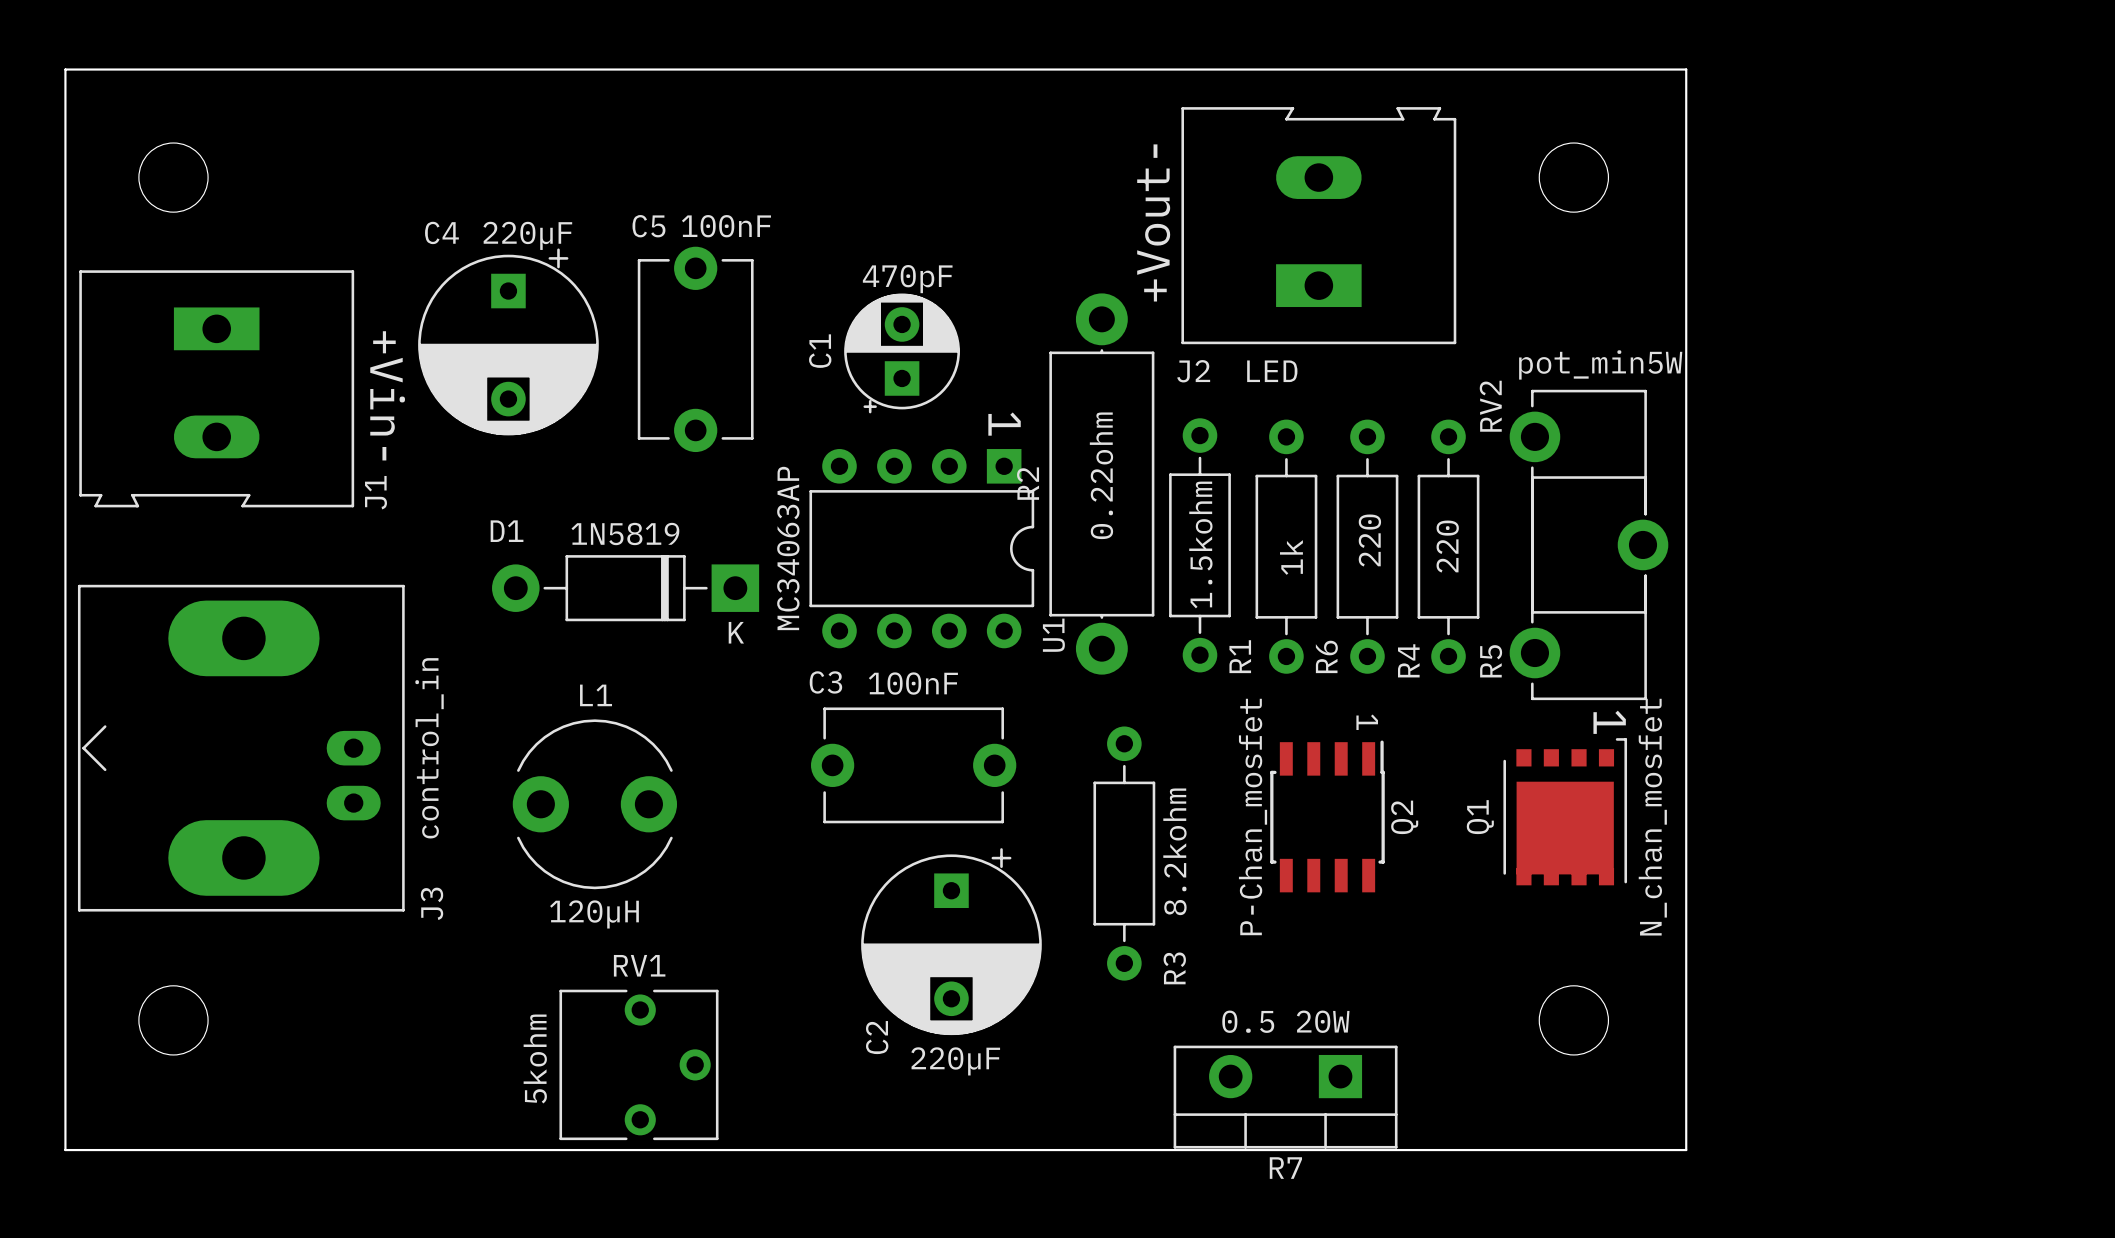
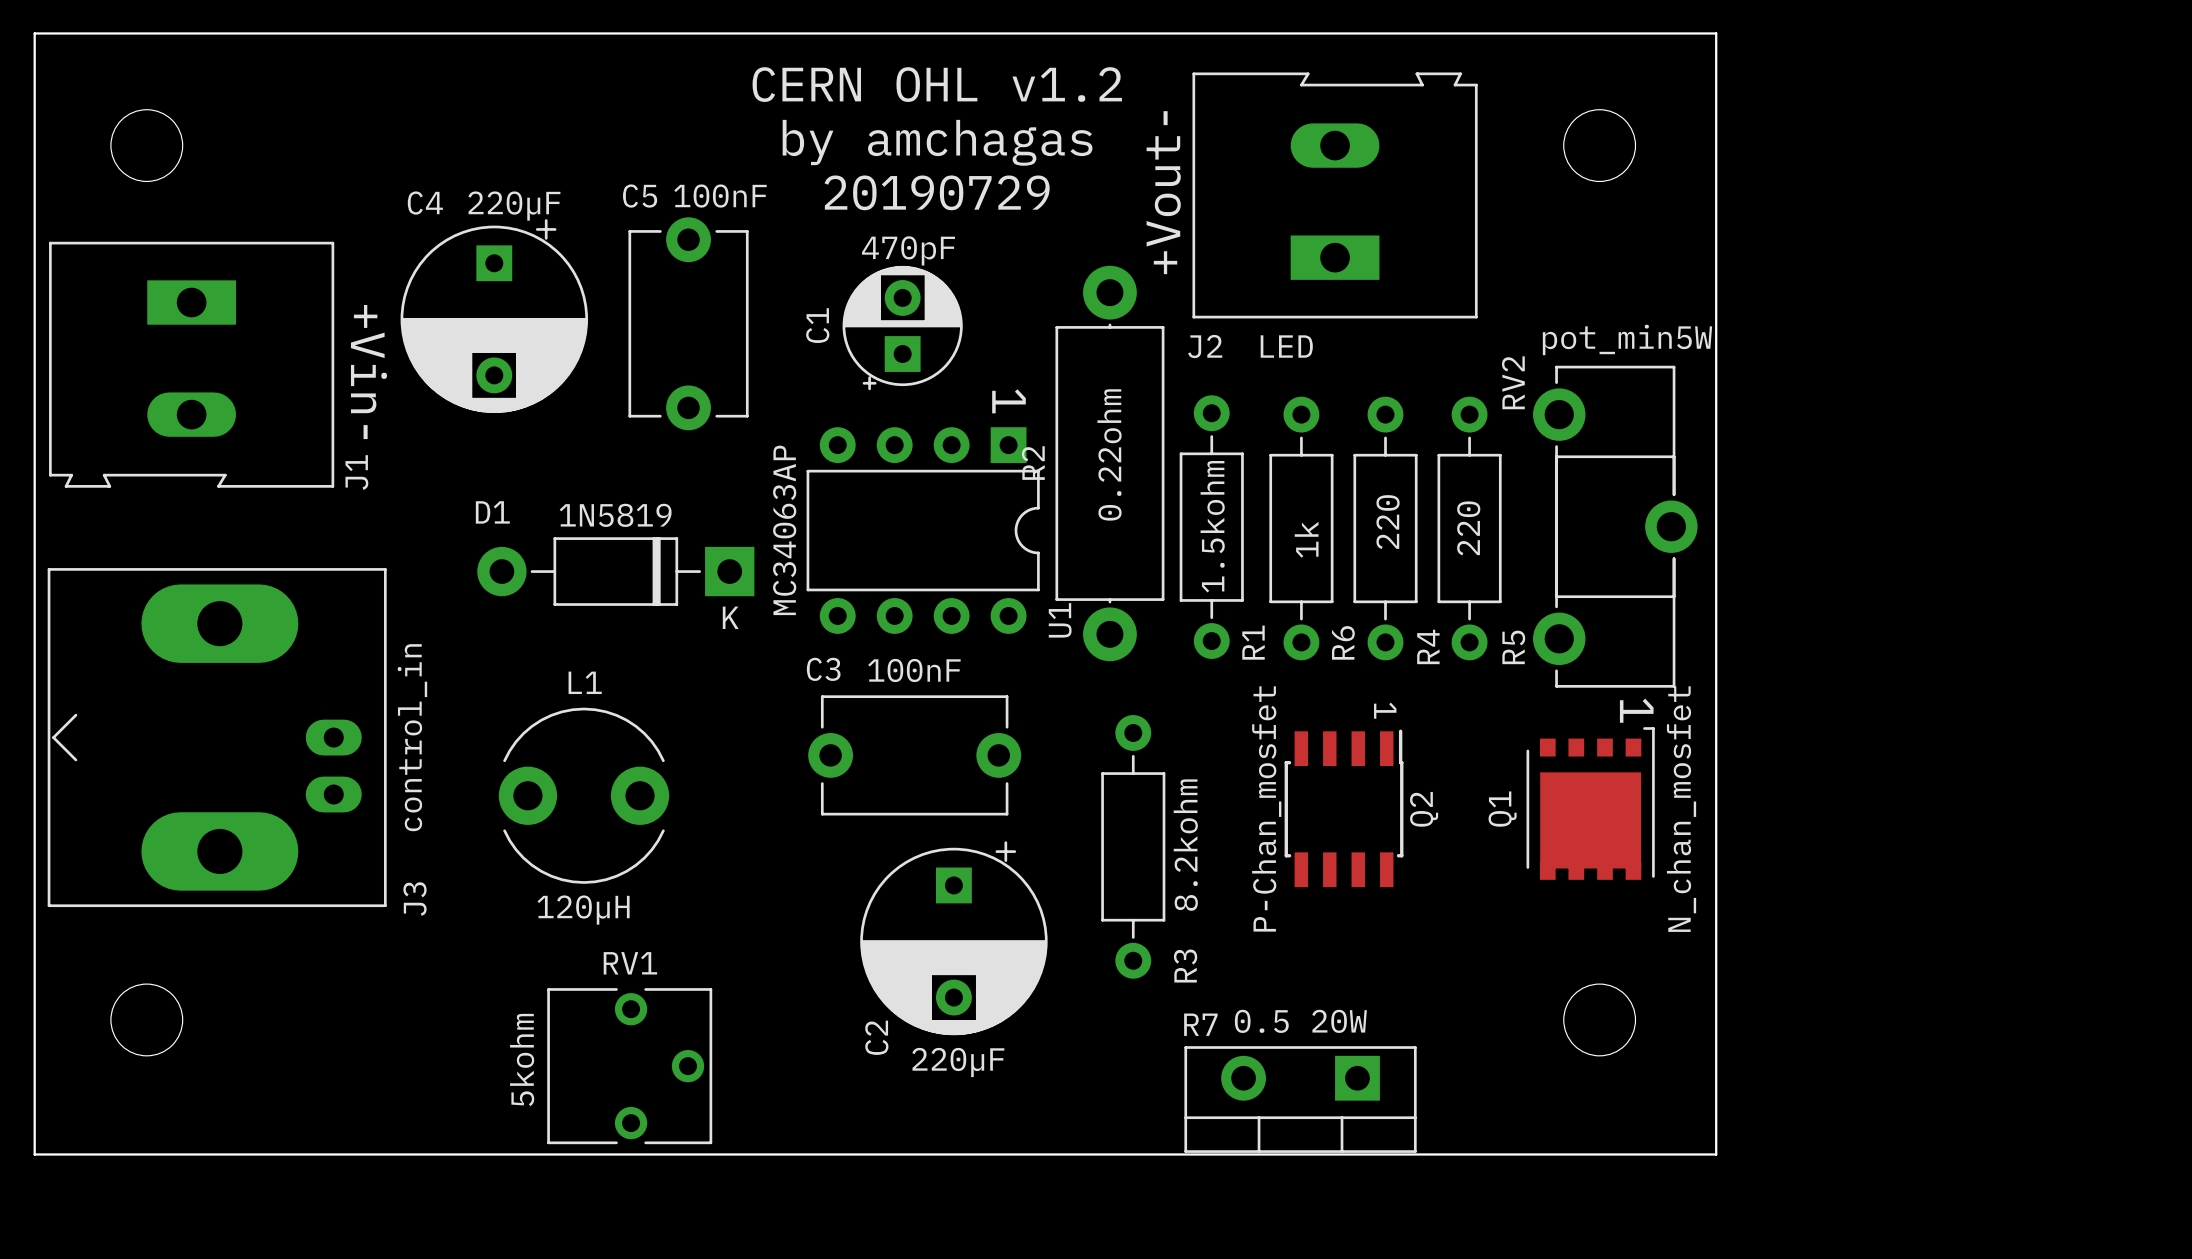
text: none -> CERN OHL v1.2 (937, 84)
text: none -> by amchagas (937, 142)
text: none -> 20190729 (937, 192)
R7 name position: R7 (1285, 1168) -> R7 (1200, 1024)

